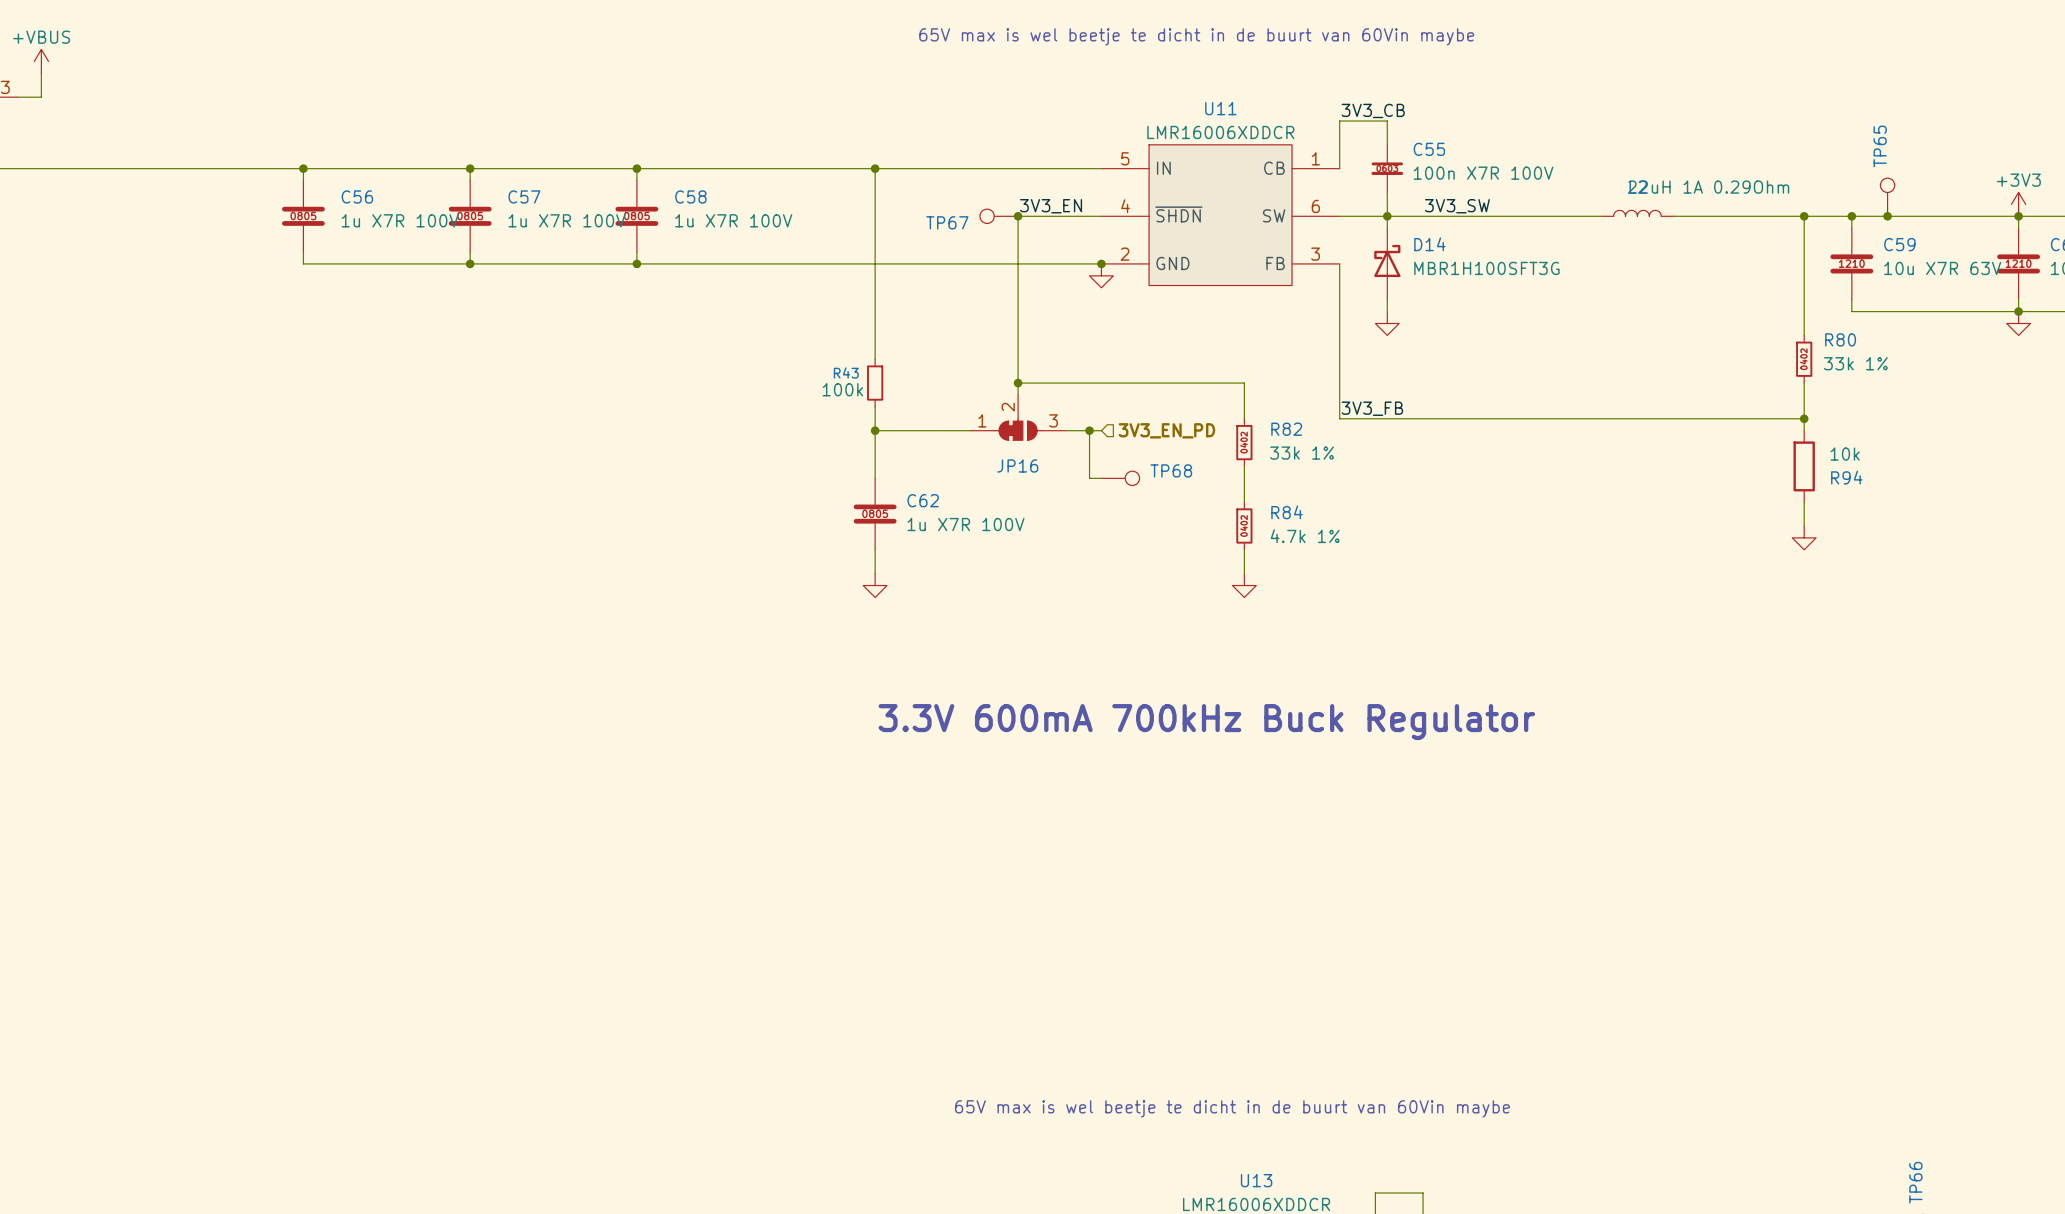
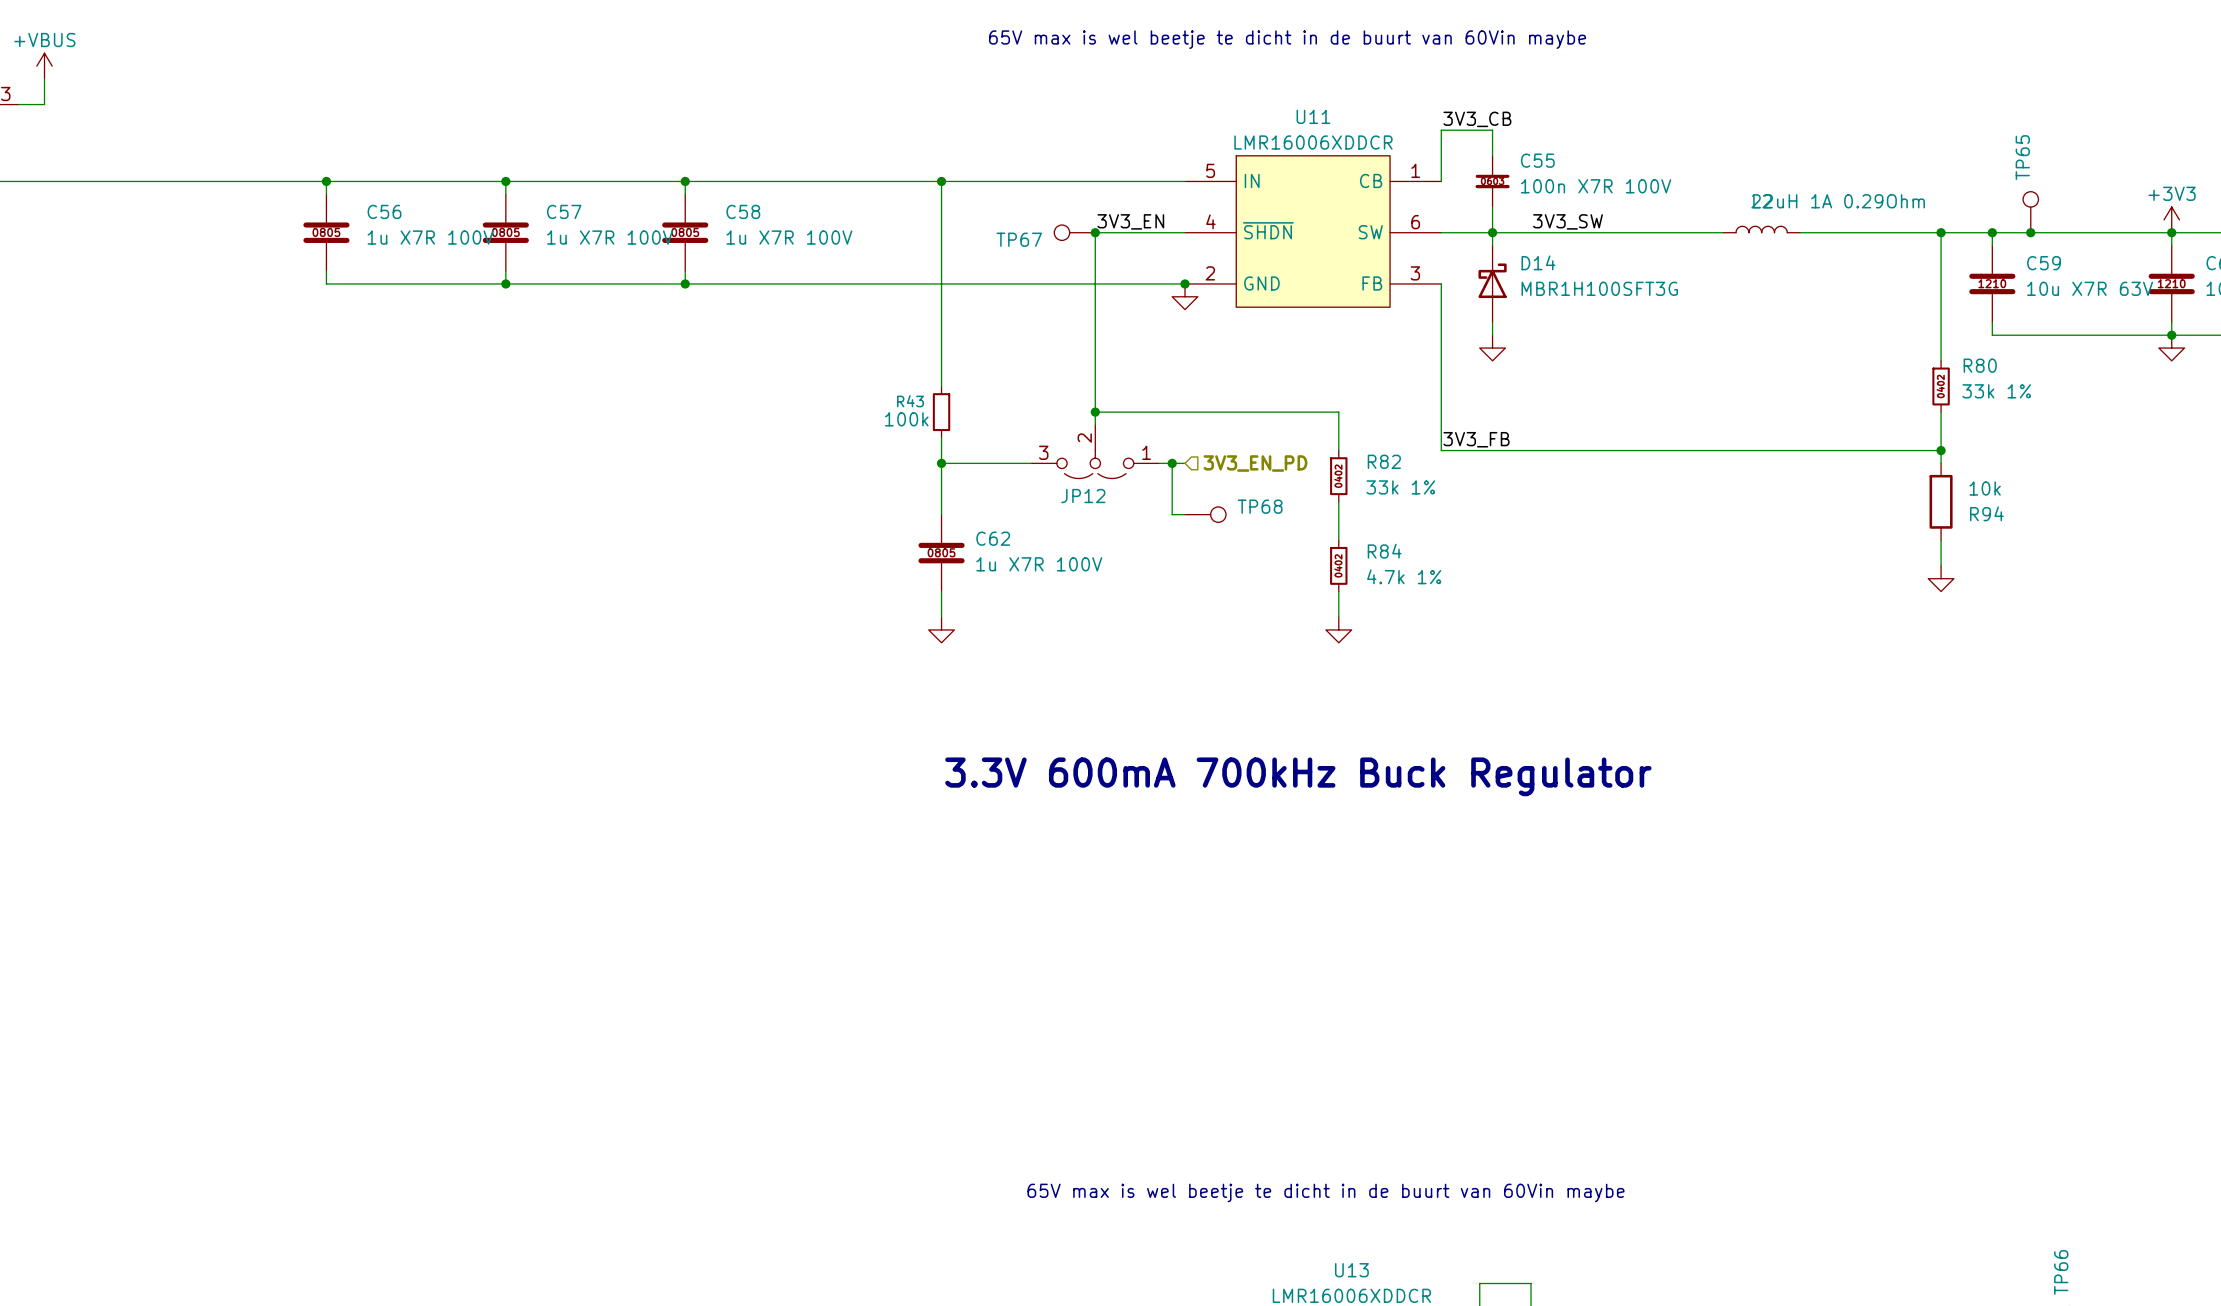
JP16: (1018, 417) -> none
JP12: none -> (1095, 451)

